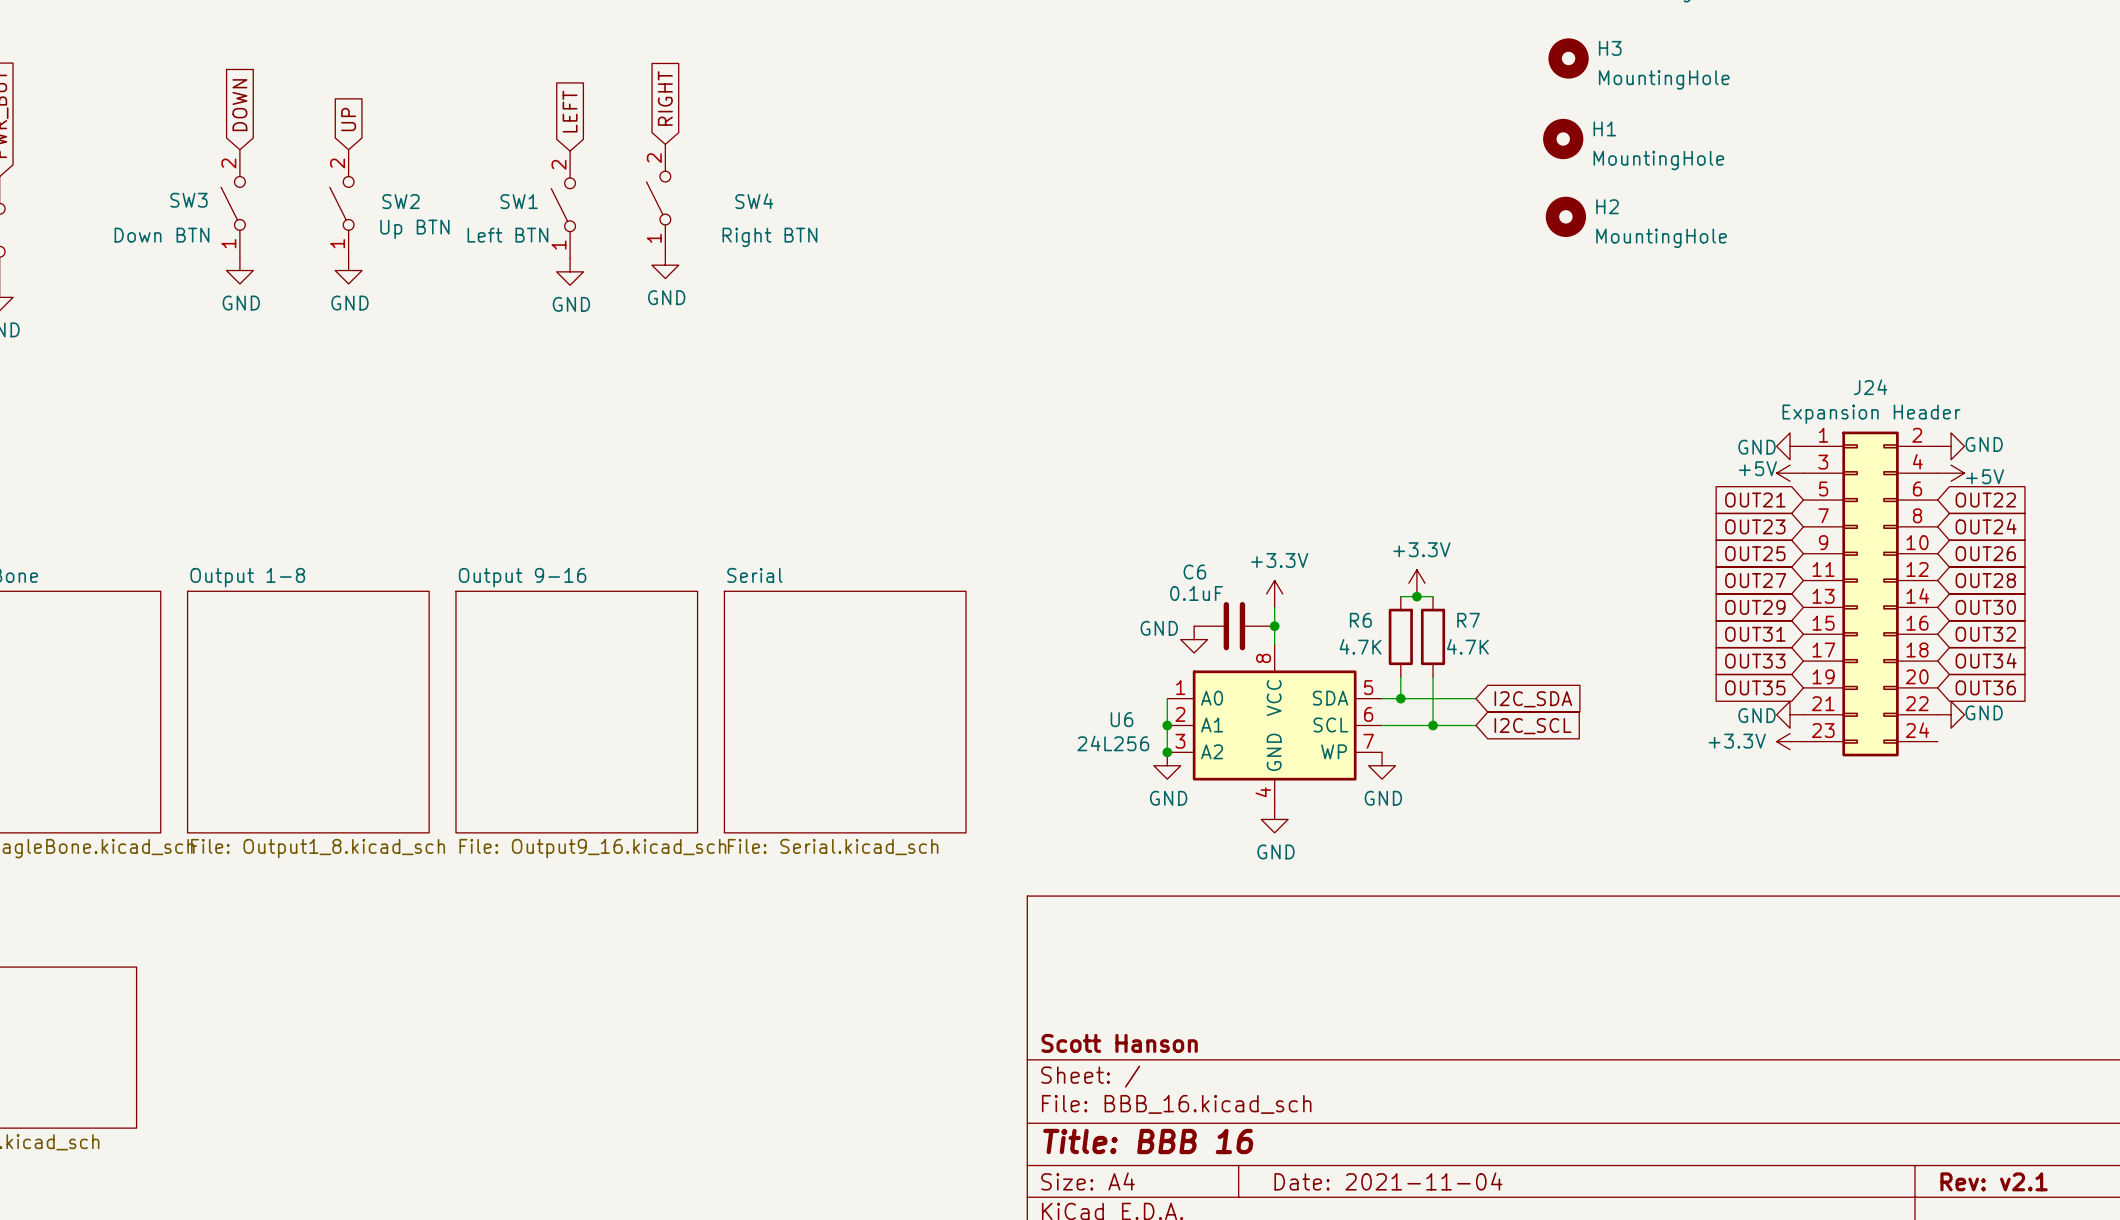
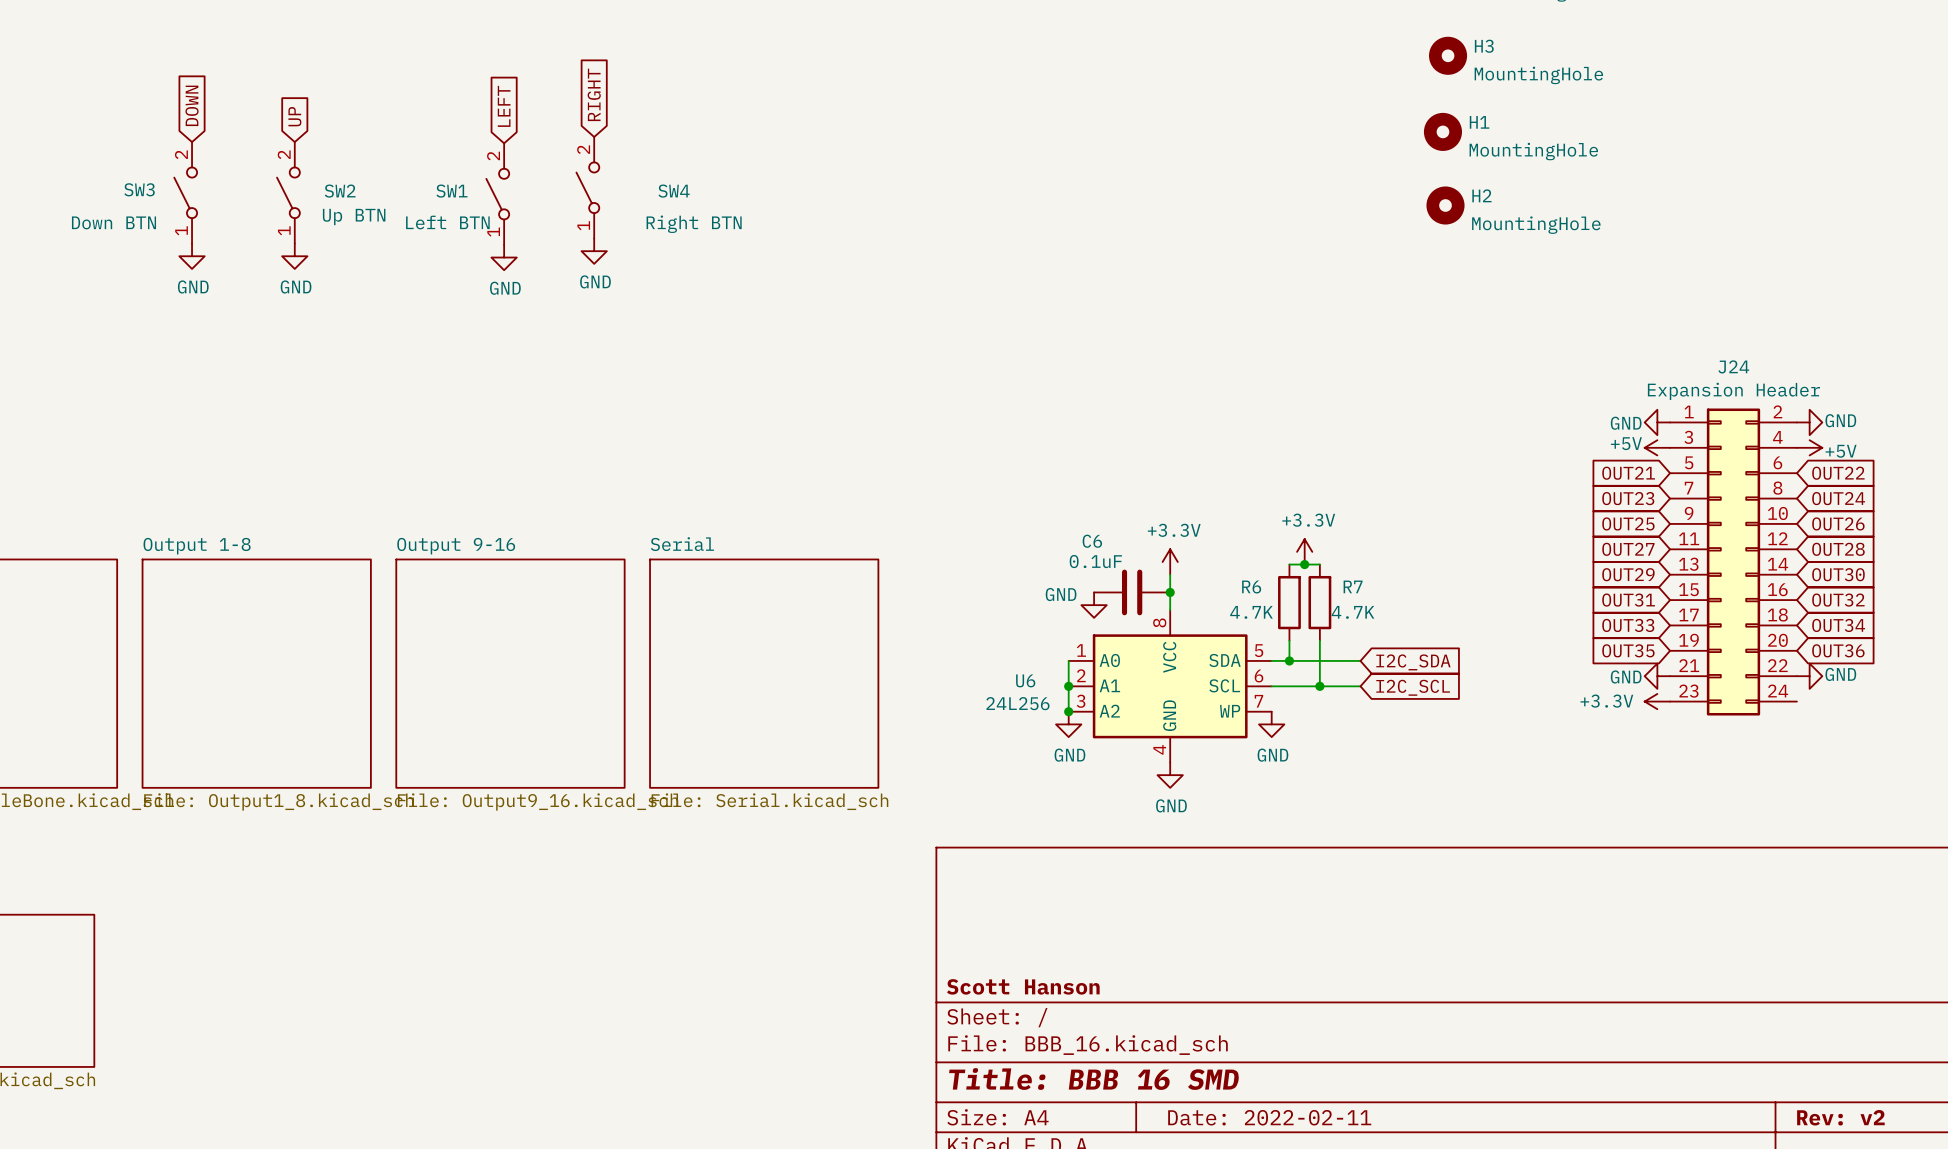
title block: Title: BBB 16 (1148, 1141) -> Title: BBB 16 SMD (1094, 1079)
title block: Date: 2021-11-04 (1388, 1181) -> Date: 2022-02-11 (1269, 1117)
title block: Rev: v2.1 (1994, 1181) -> Rev: v2 (1840, 1117)

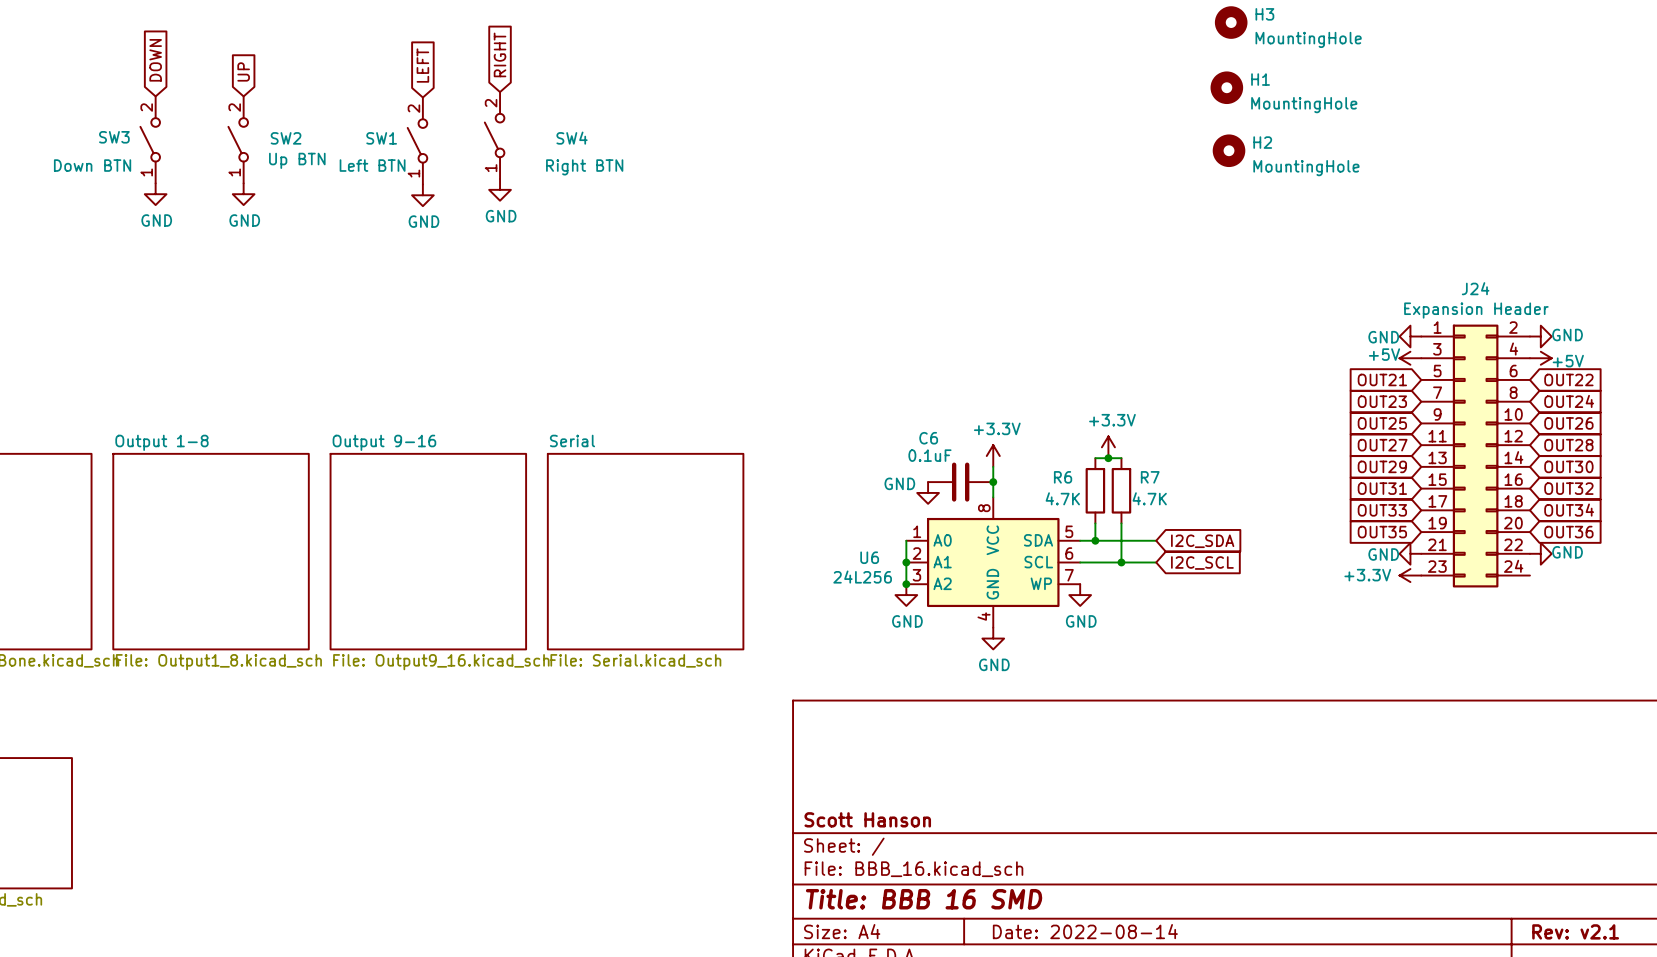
title block: Date: 2022-02-11 (1269, 1117) -> Date: 2022-08-14 (1085, 931)
title block: Rev: v2 (1840, 1117) -> Rev: v2.1 (1575, 931)

